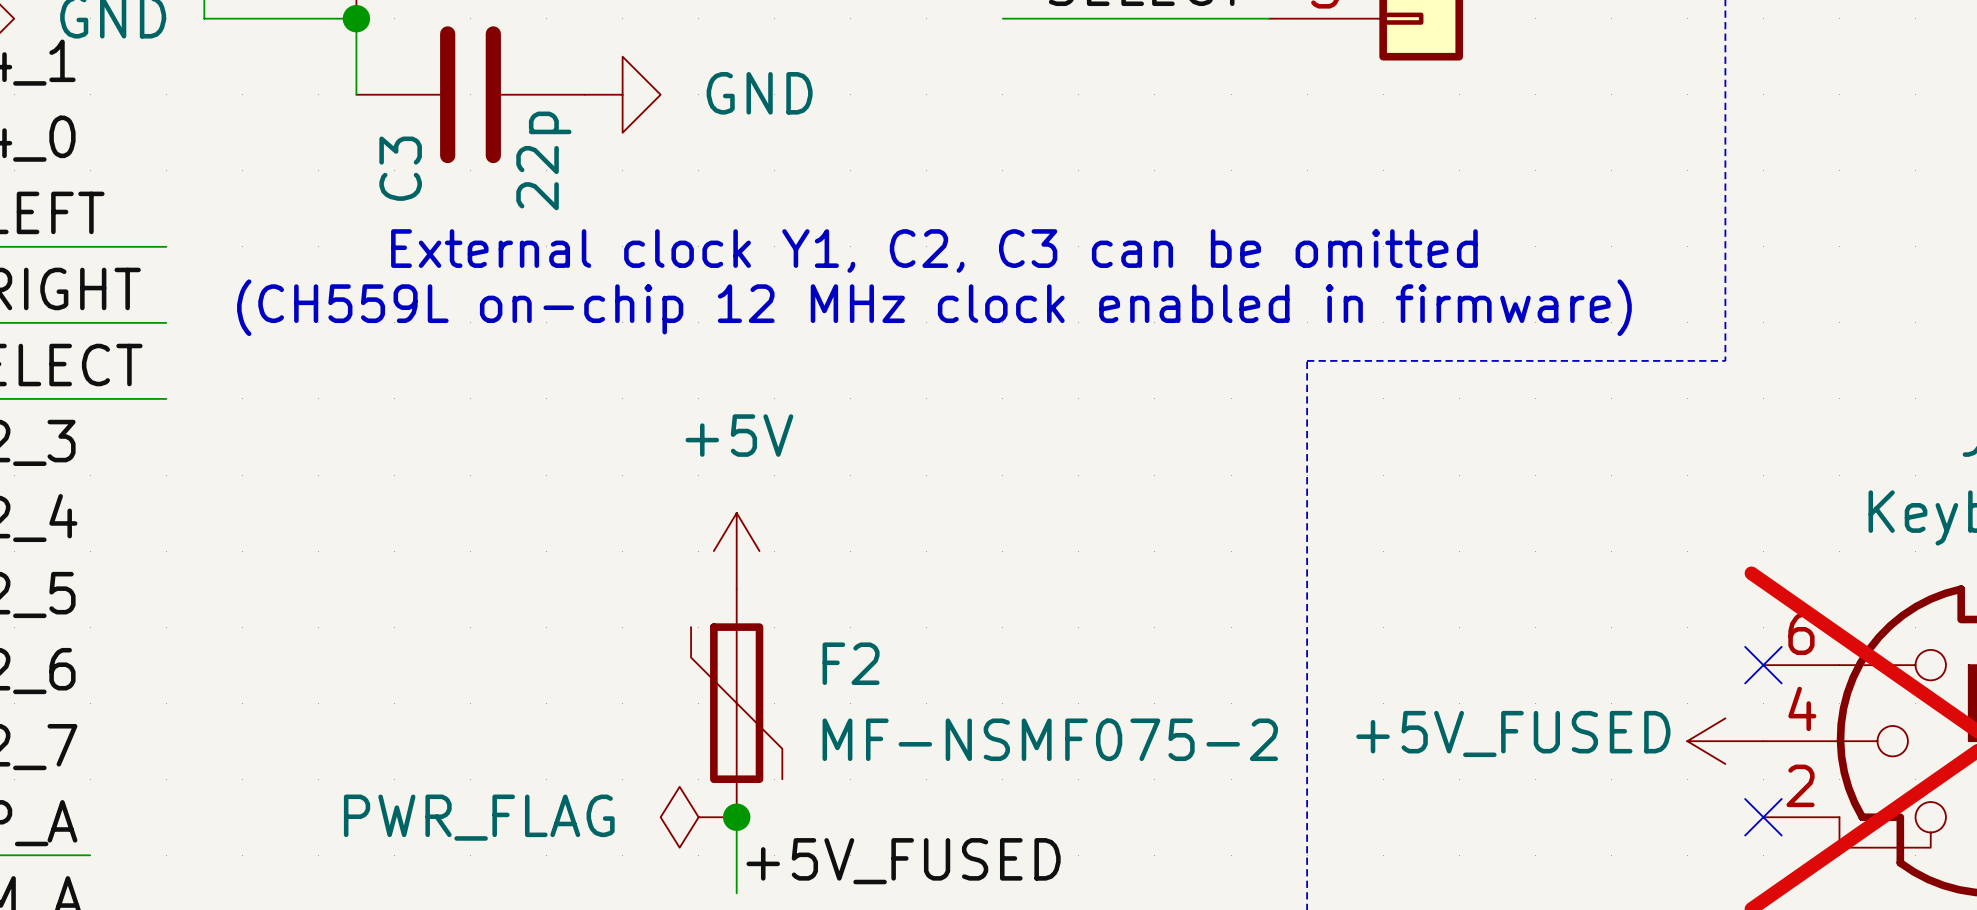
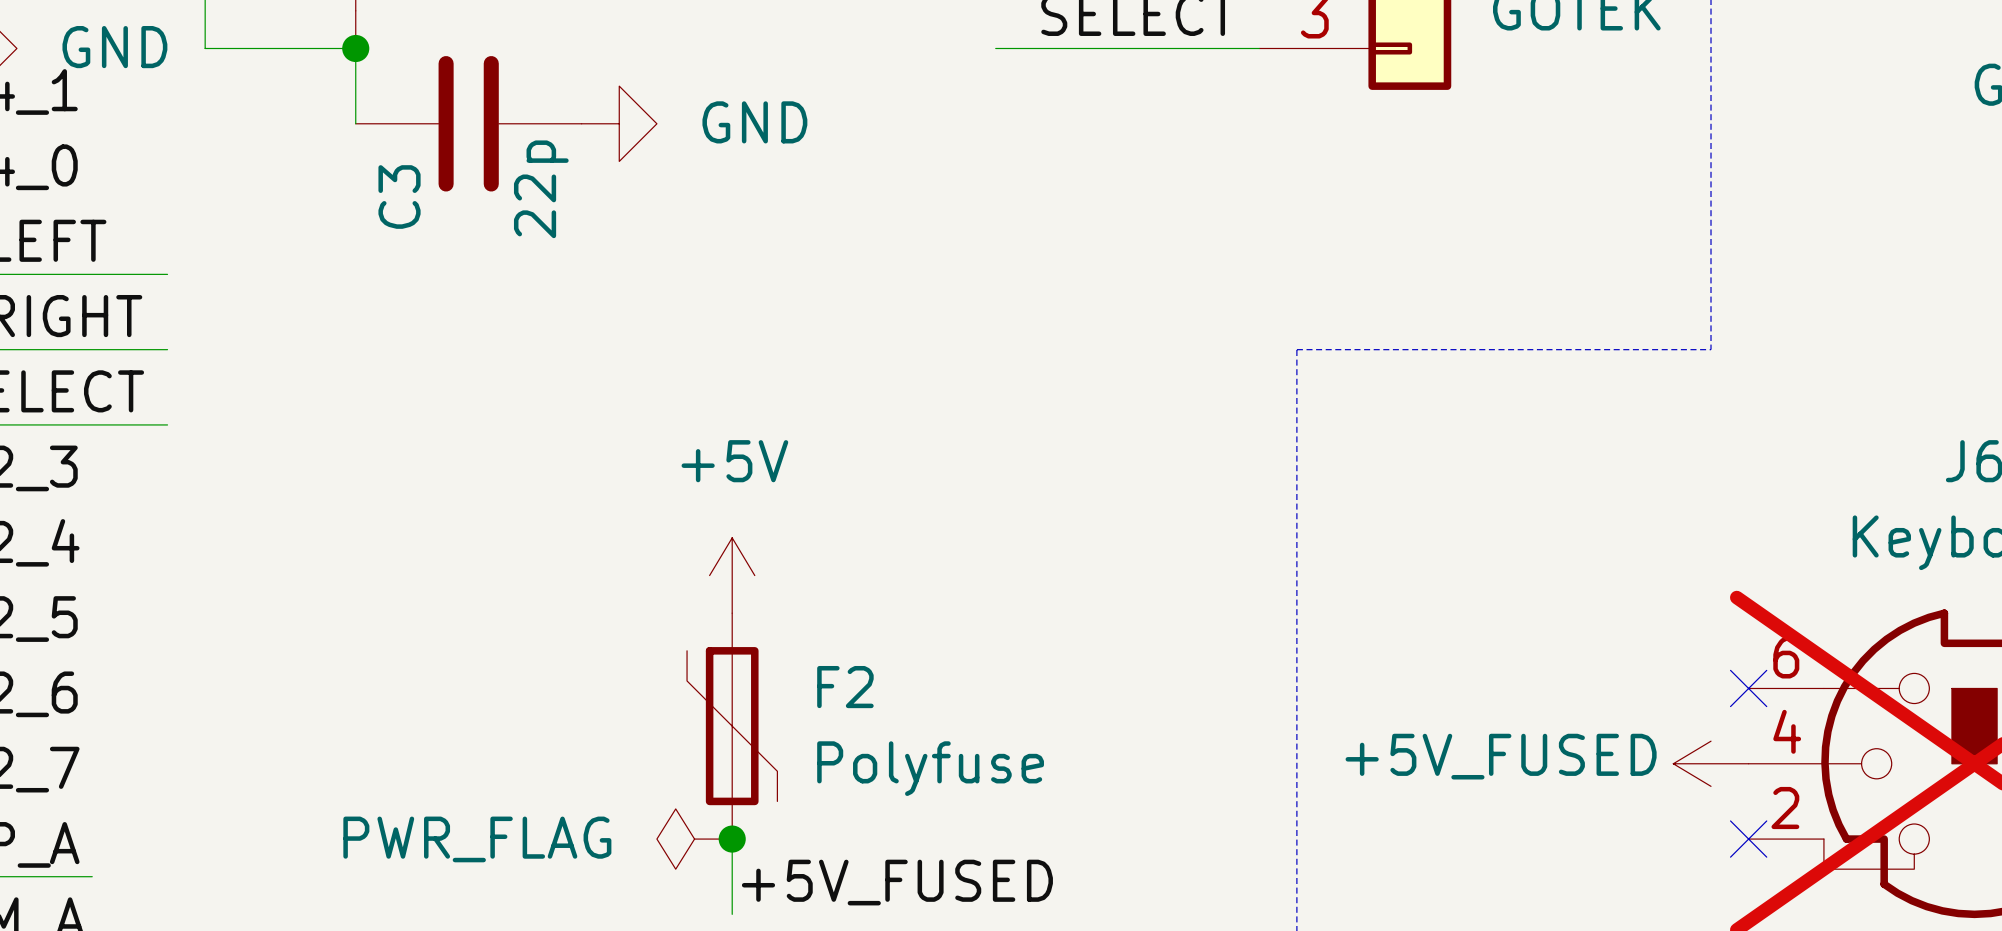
text: External clock Y1, C2, C3 can be omitted (934, 251) -> none
text: (CH559L on-chip 12 MHz clock enabled in firmware) (934, 307) -> none
line: (1725, 322) (1725, 360) (1307, 360) -> (1711, 349) (1296, 349) (1296, 387)
F2 value: MF-NSMF075-2 (1050, 739) -> Polyfuse (930, 768)

